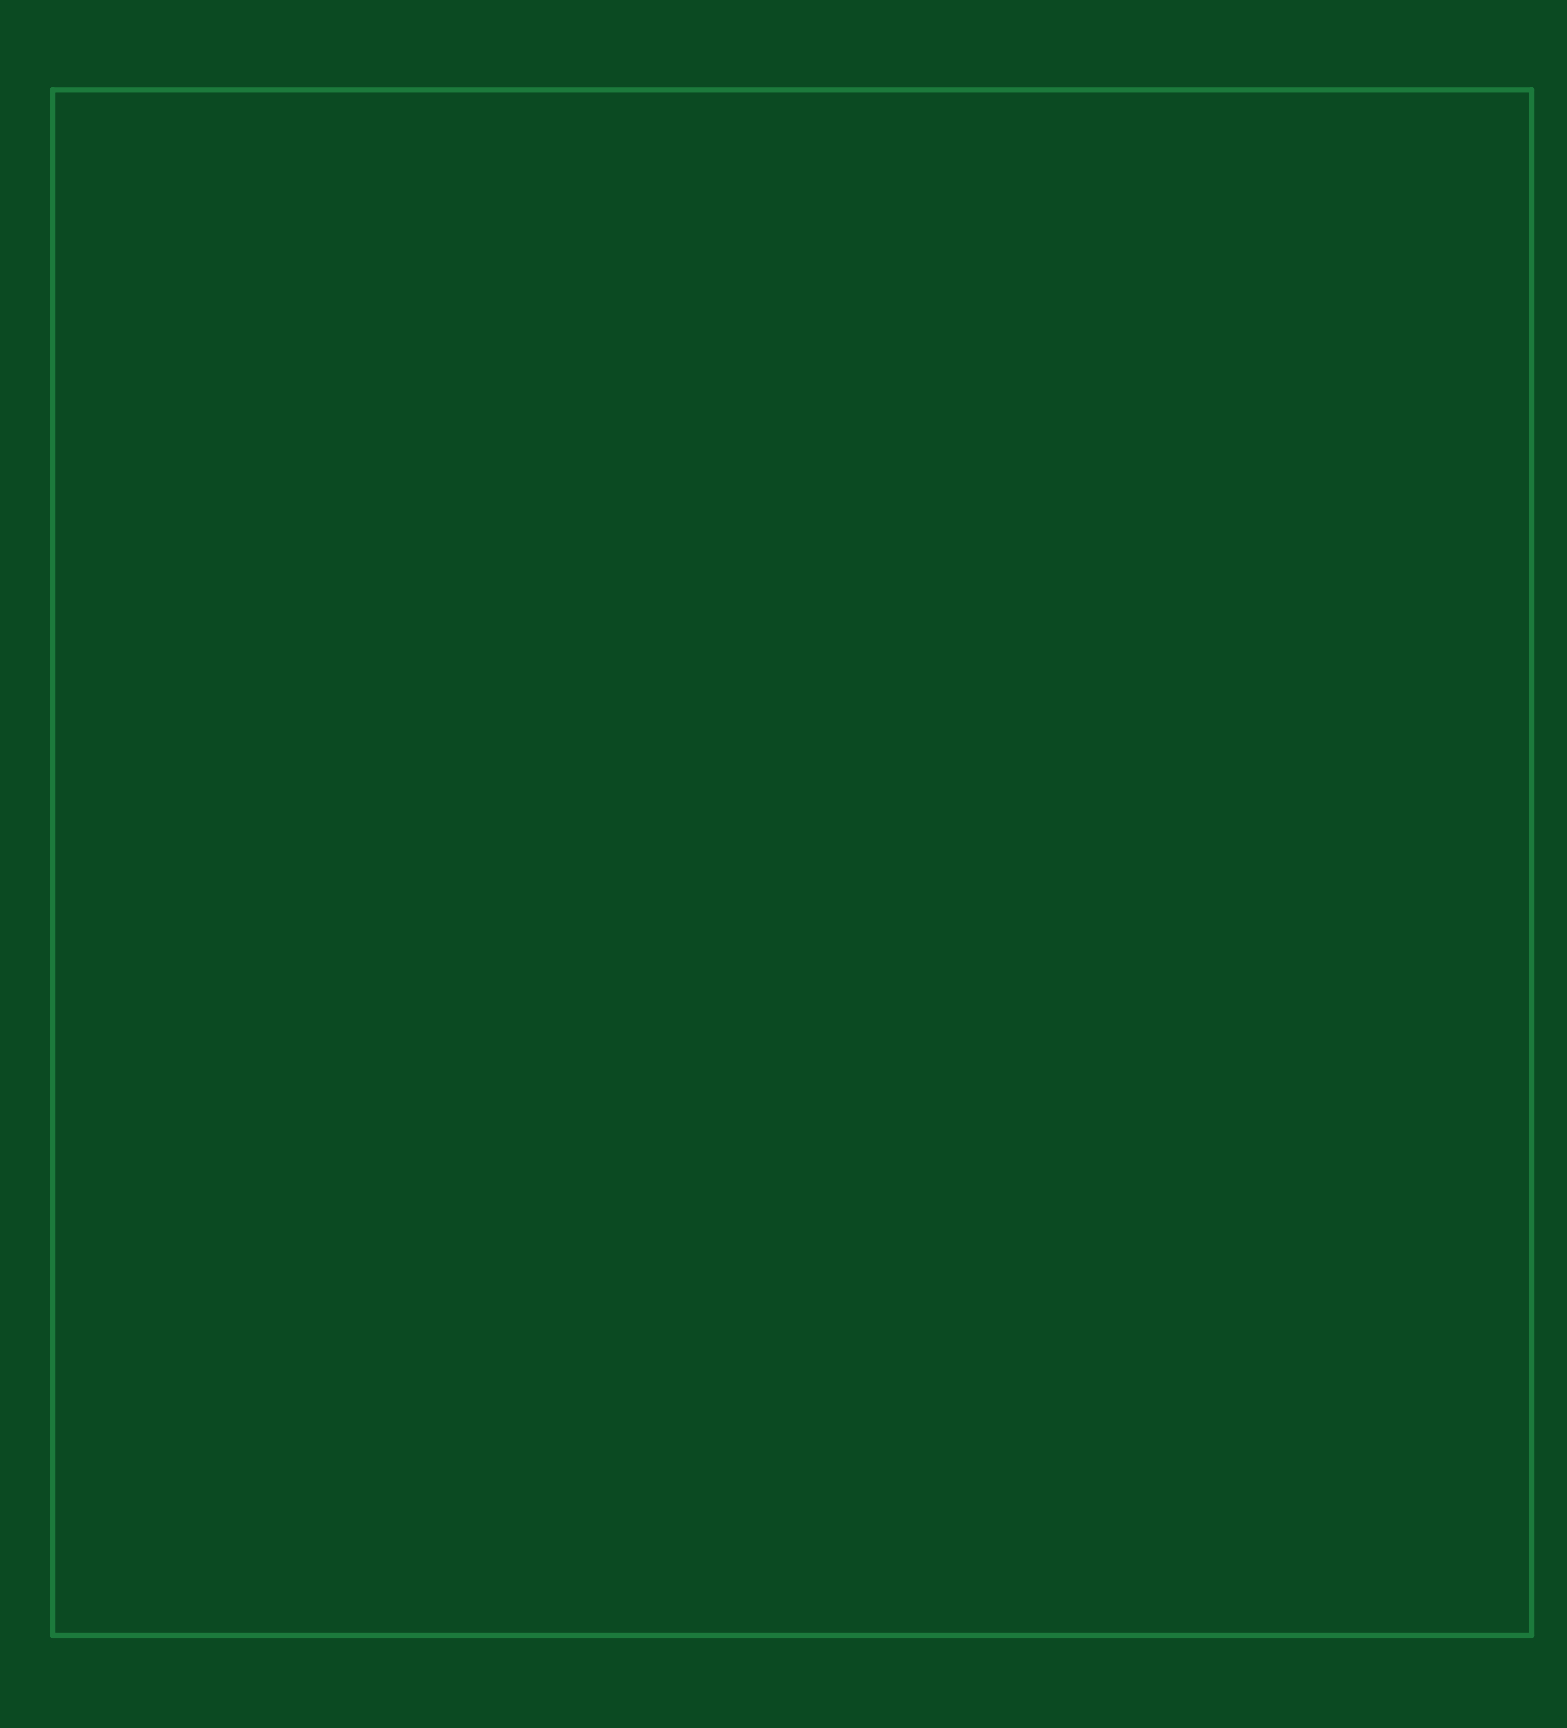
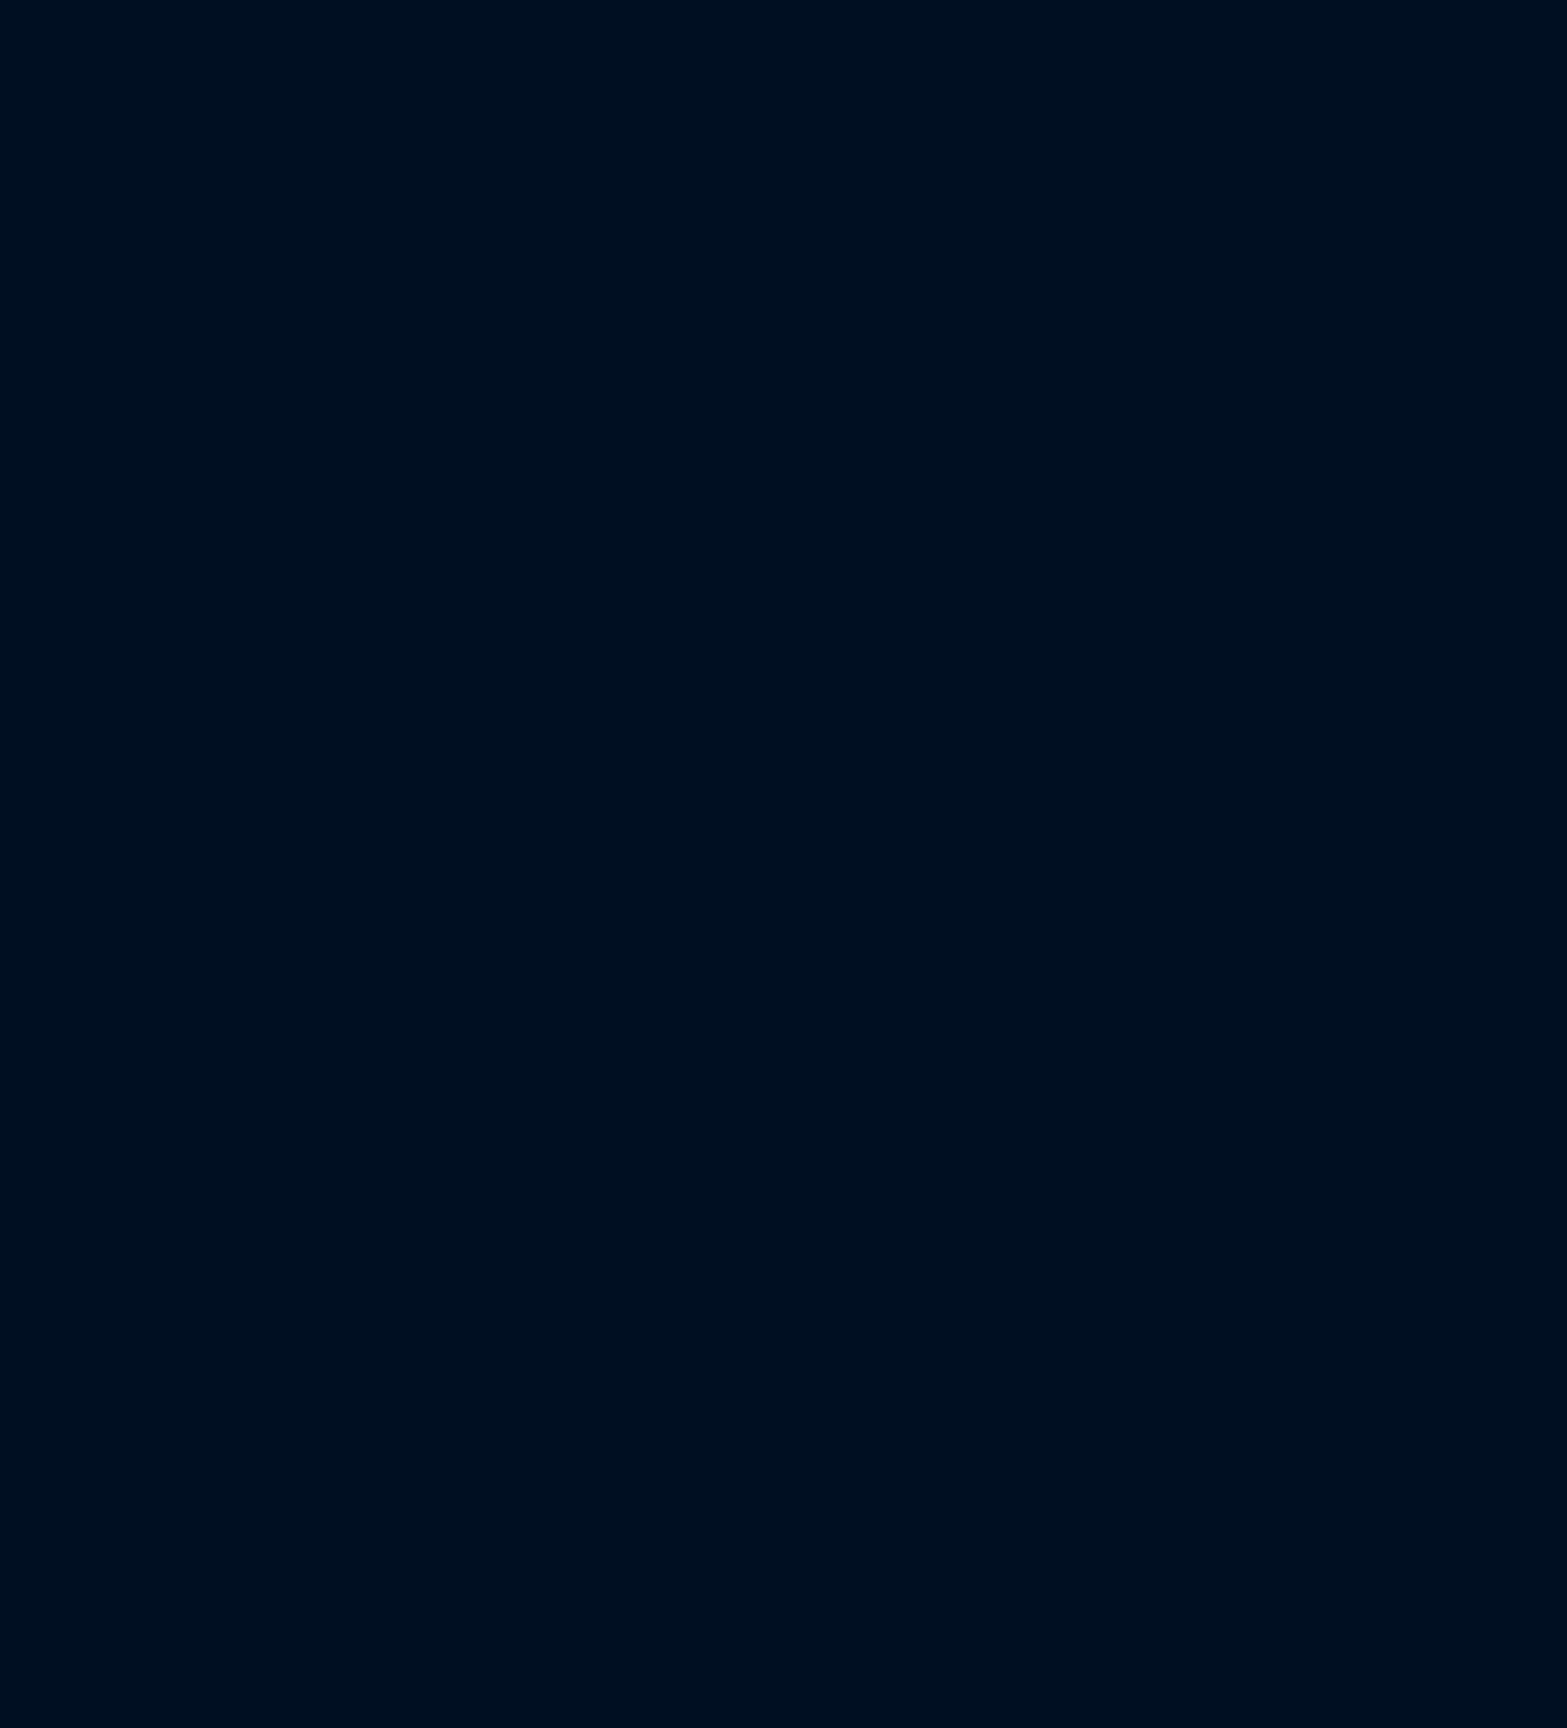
track: (52, 89) (1531, 89) (1531, 1635) (52, 1635) (52, 89) -> none

